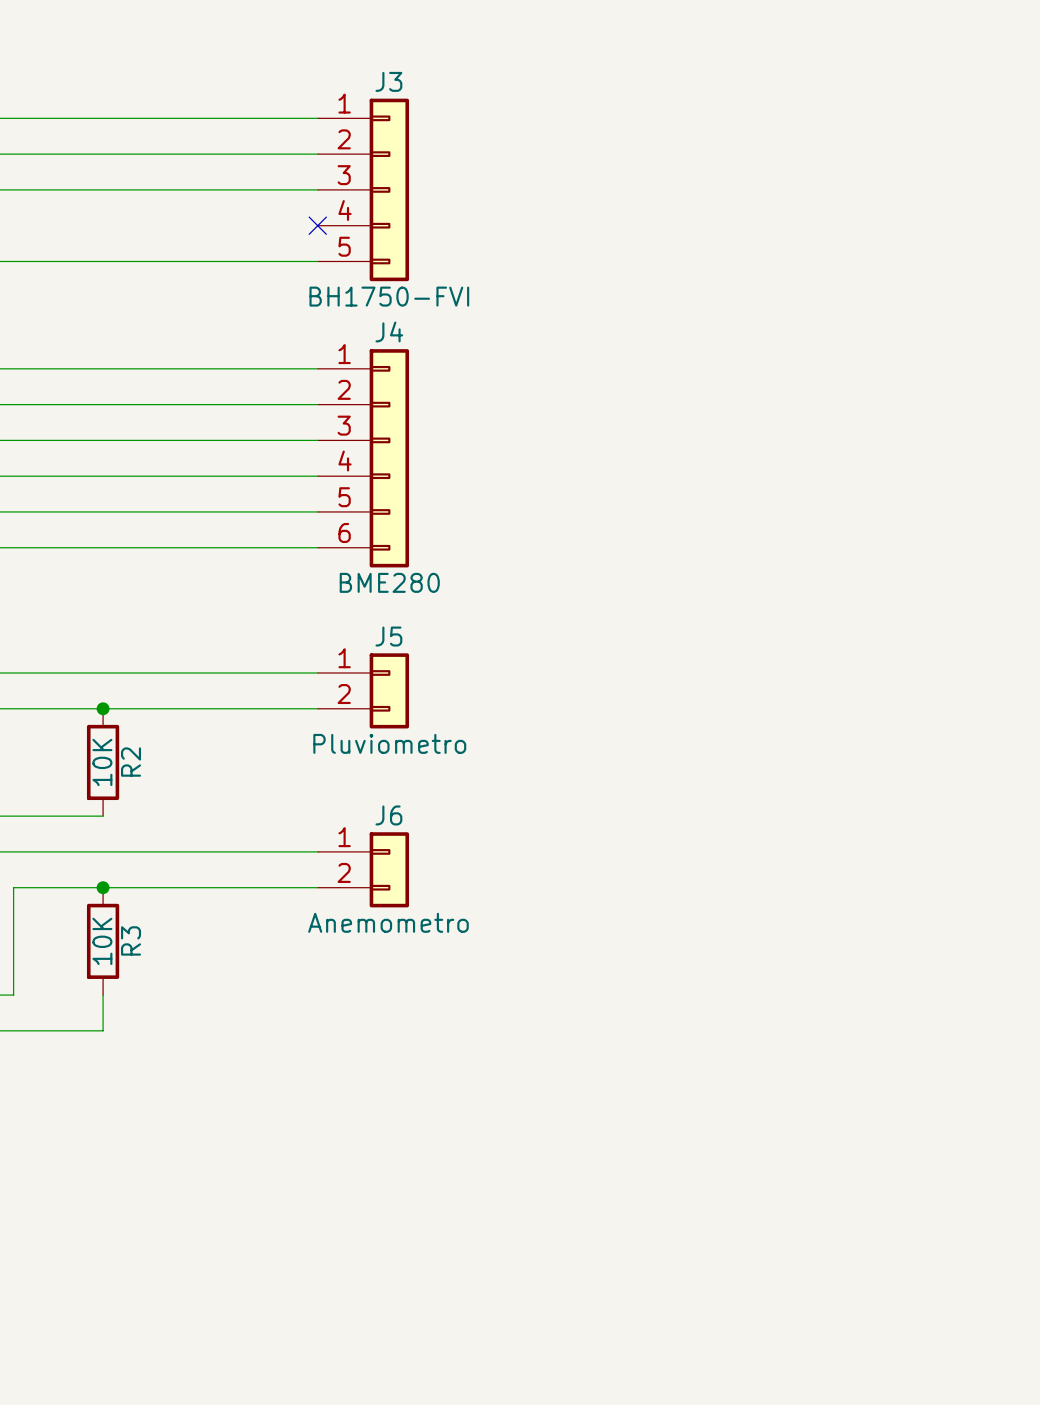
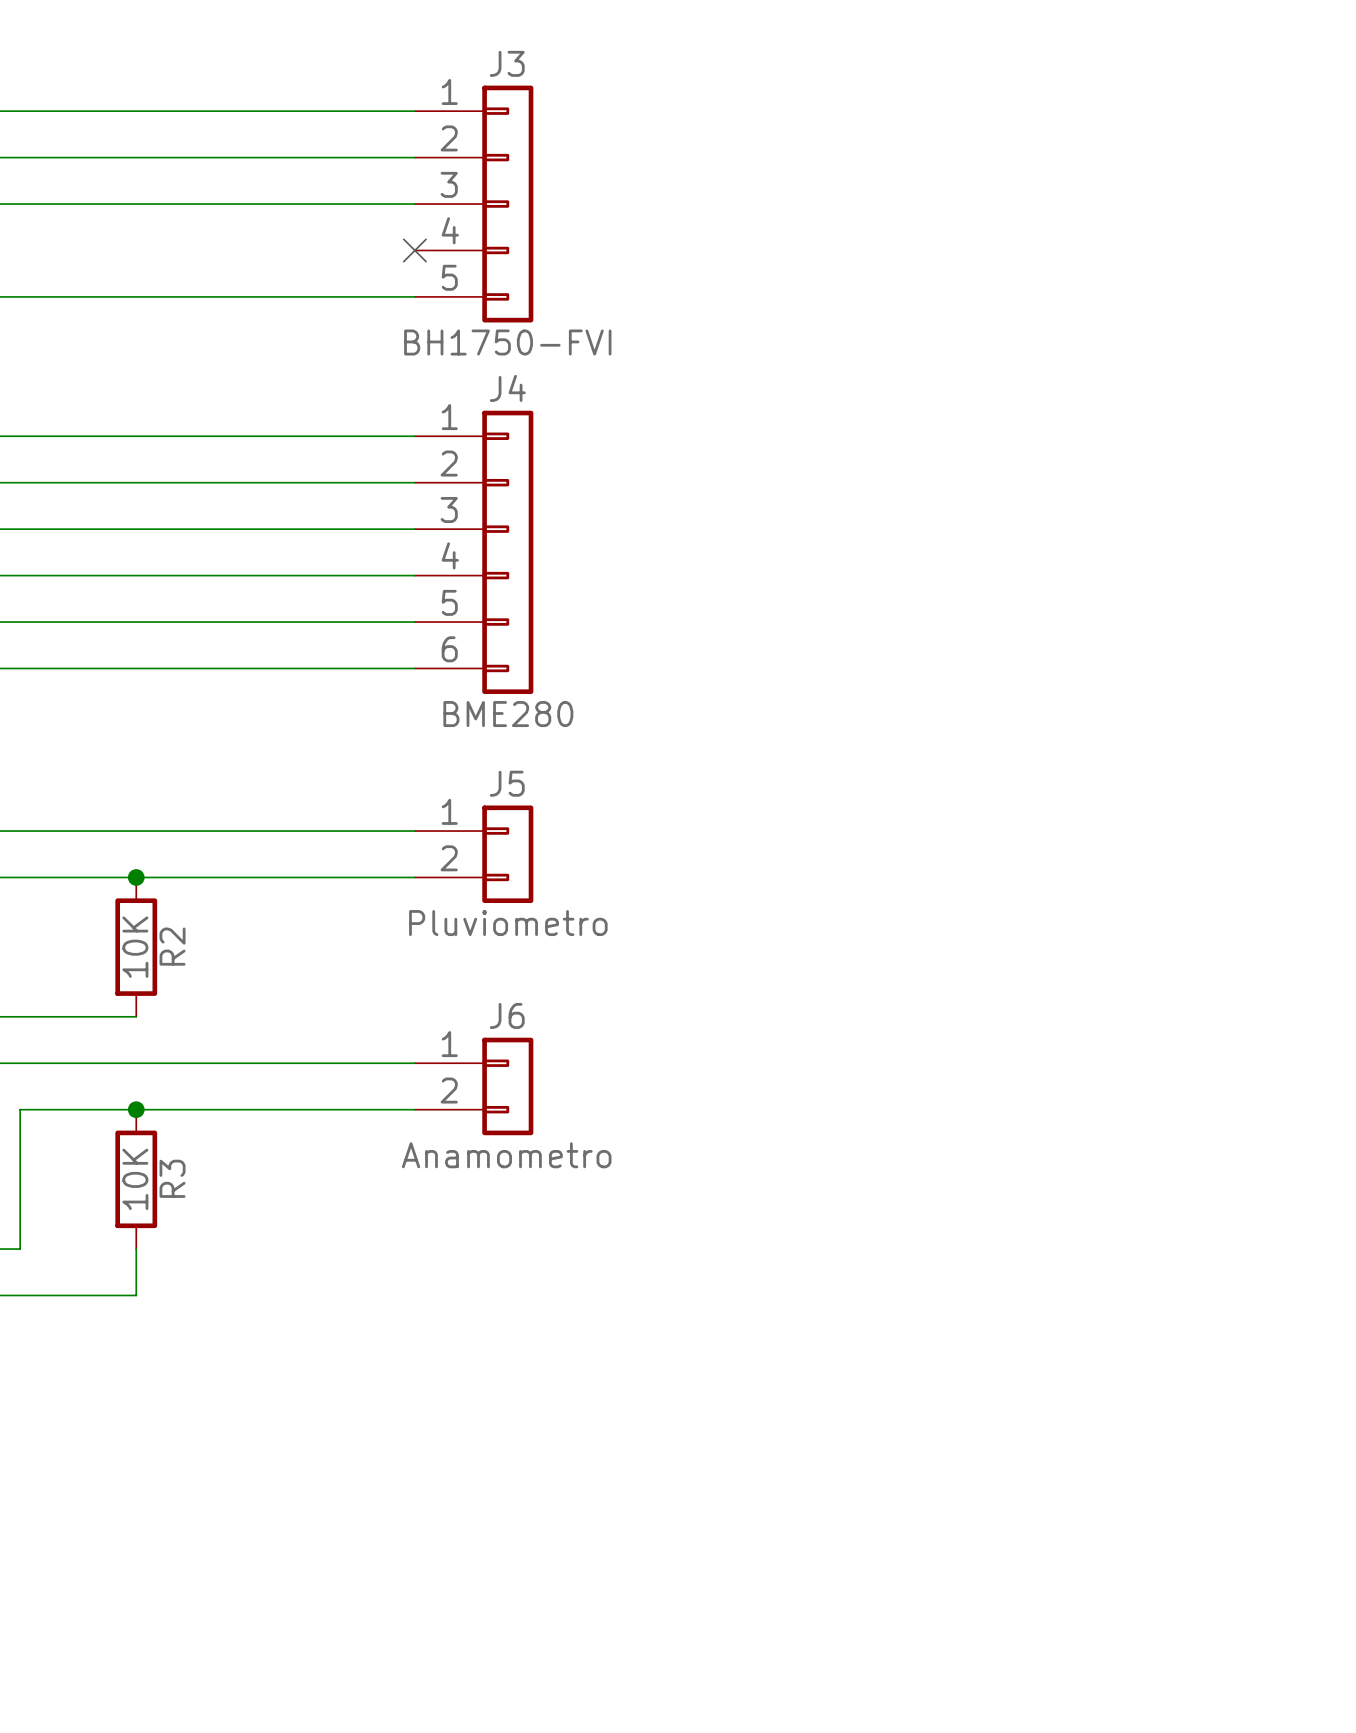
J6 value: Anemometro (388, 922) -> Anamometro (506, 1155)

